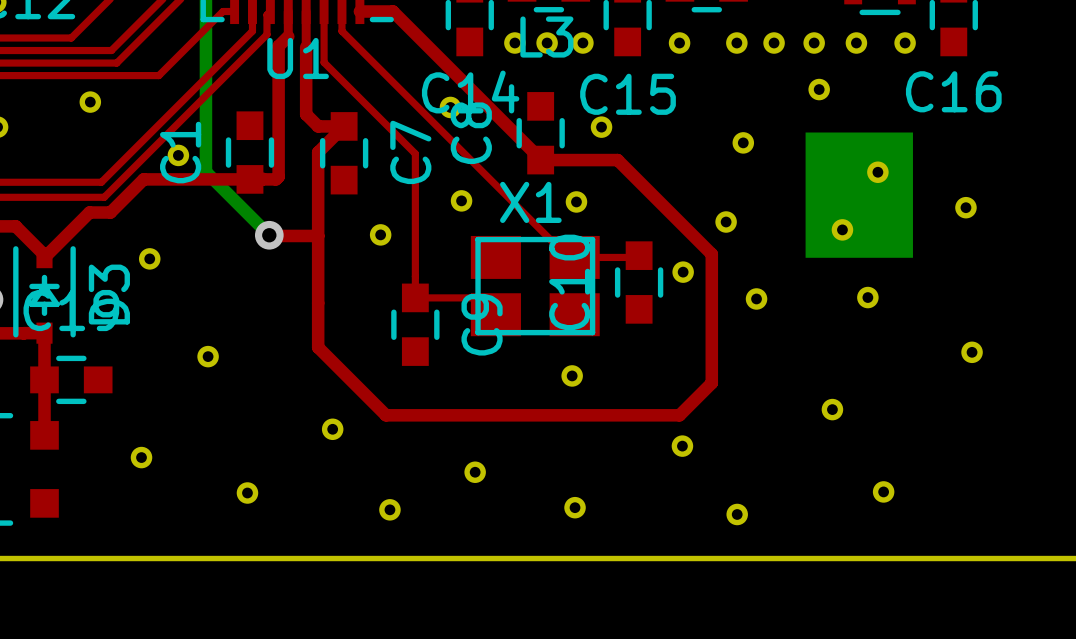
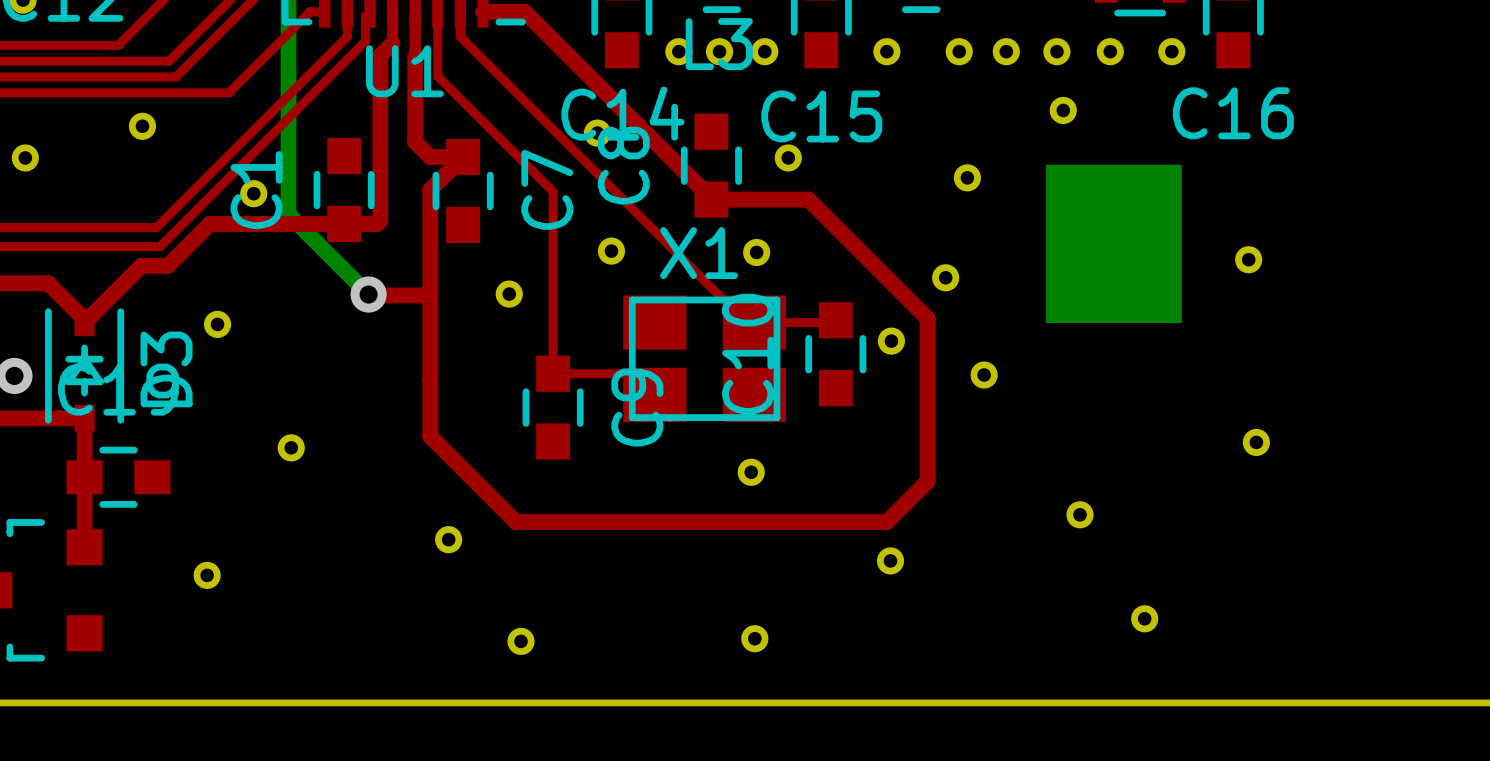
part: (877, 172) -> none
part: (842, 229) -> none
part: (867, 297) -> none
part: (475, 472) -> none
part: (247, 493) -> none
part: (737, 514) -> none

